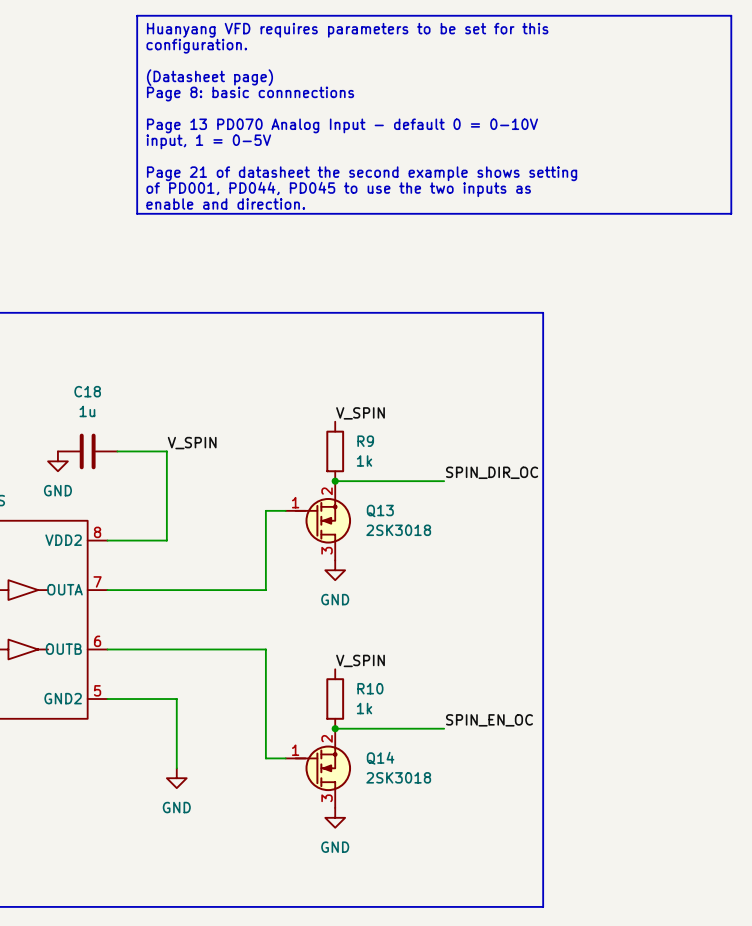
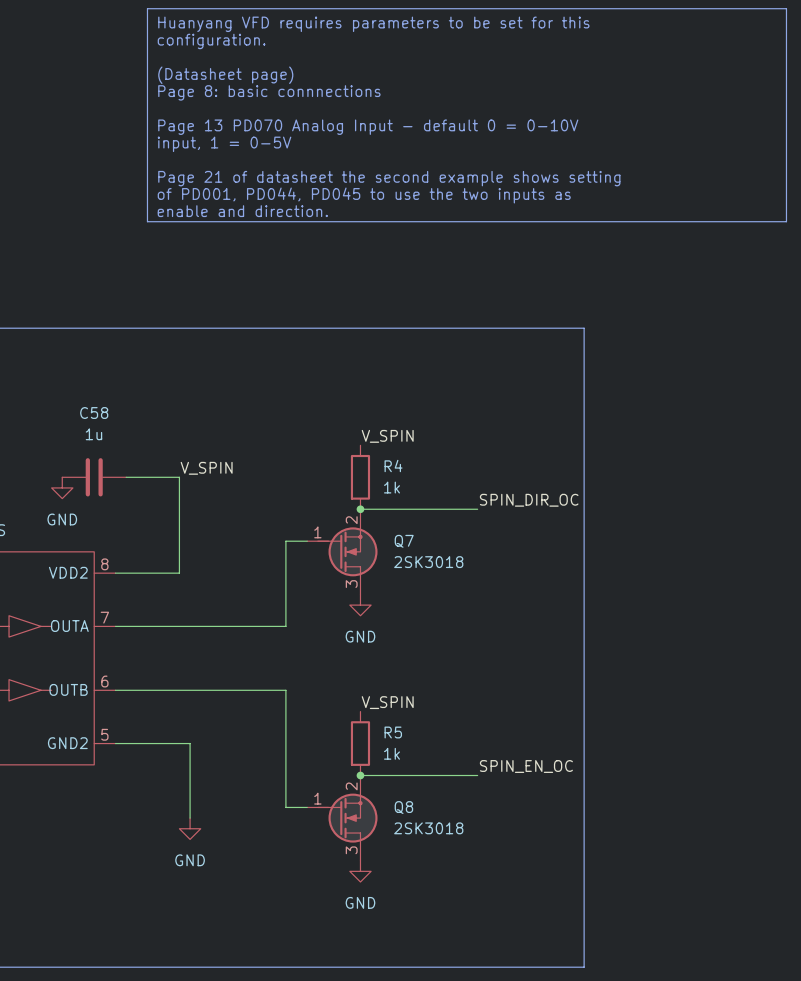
C18 name: C18 (87, 391) -> C58 (94, 413)
R9 name: R9 (365, 441) -> R4 (393, 466)
Q13 name: Q13 (380, 510) -> Q7 (404, 541)
R10 name: R10 (370, 688) -> R5 (393, 732)
Q14 name: Q14 (380, 758) -> Q8 (403, 807)

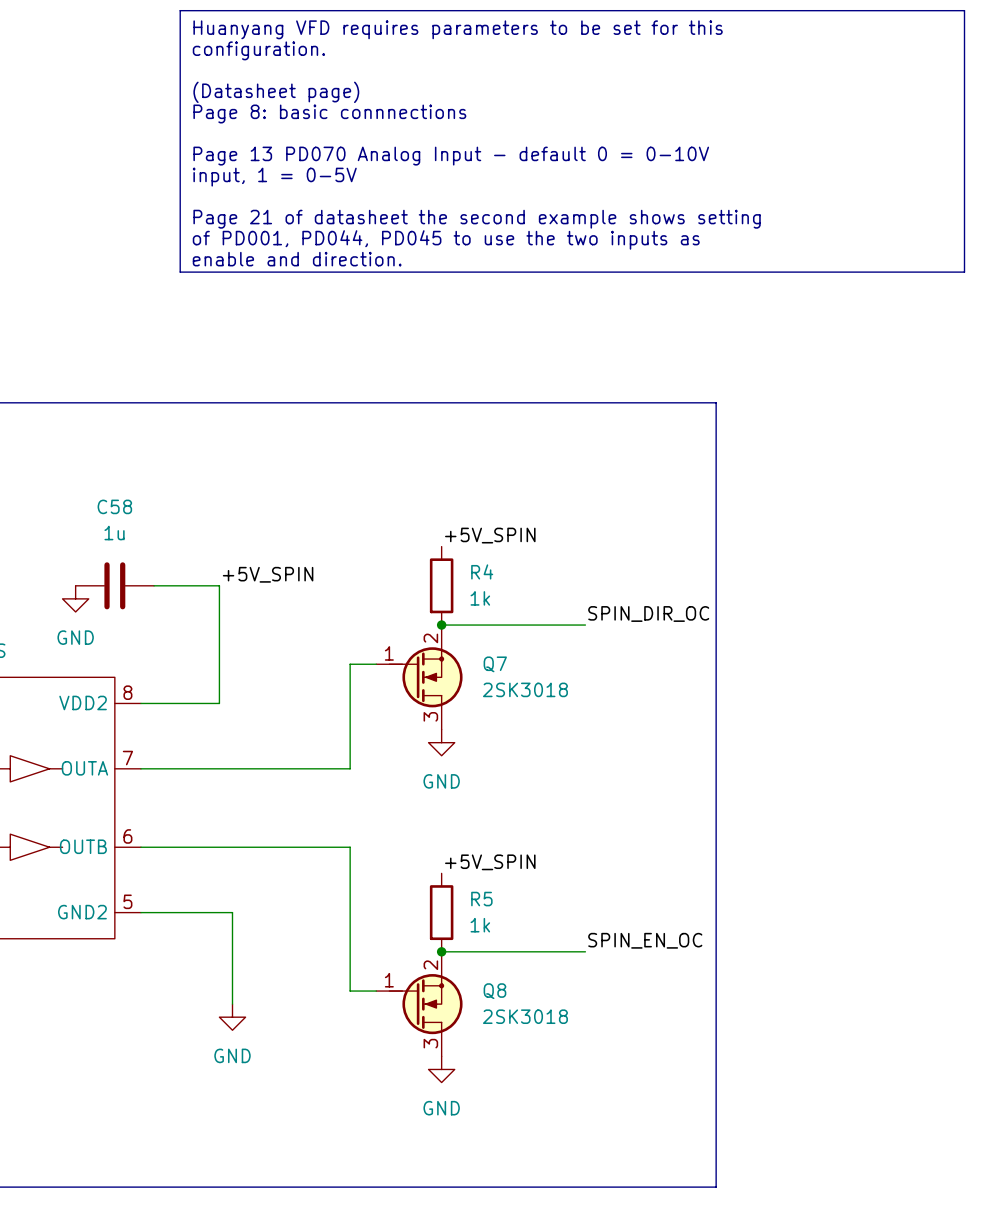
label: V_SPIN (387, 436) -> +5V_SPIN (490, 535)
label: V_SPIN (206, 468) -> +5V_SPIN (268, 574)
label: V_SPIN (387, 702) -> +5V_SPIN (490, 862)

